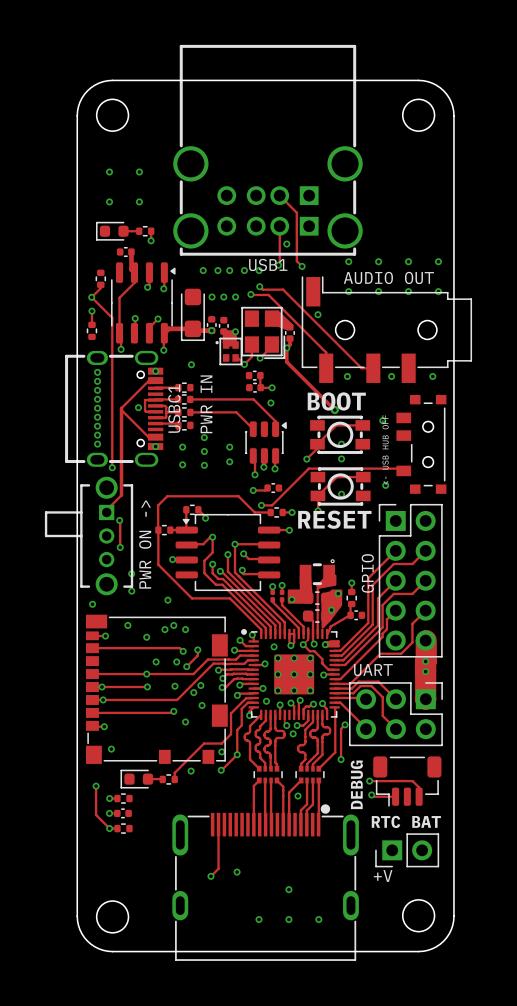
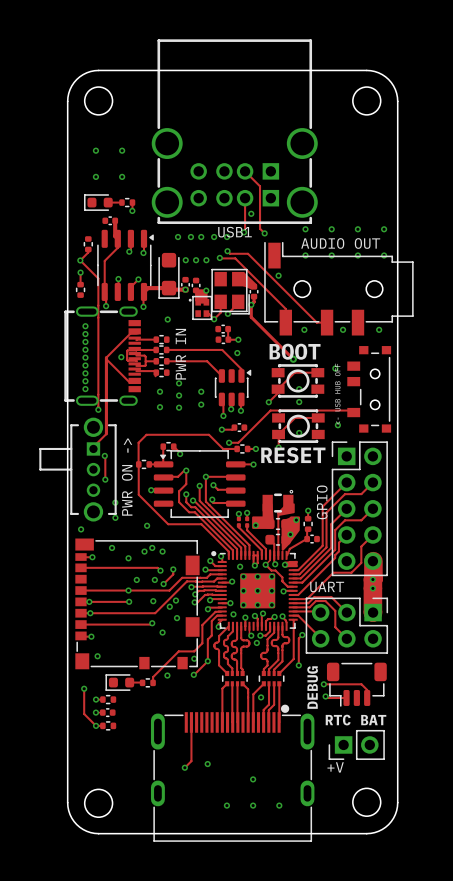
via: (155, 371) -> none
part: none -> (102, 356)
USBC1: (114, 408) -> none
via: (155, 446) -> none

